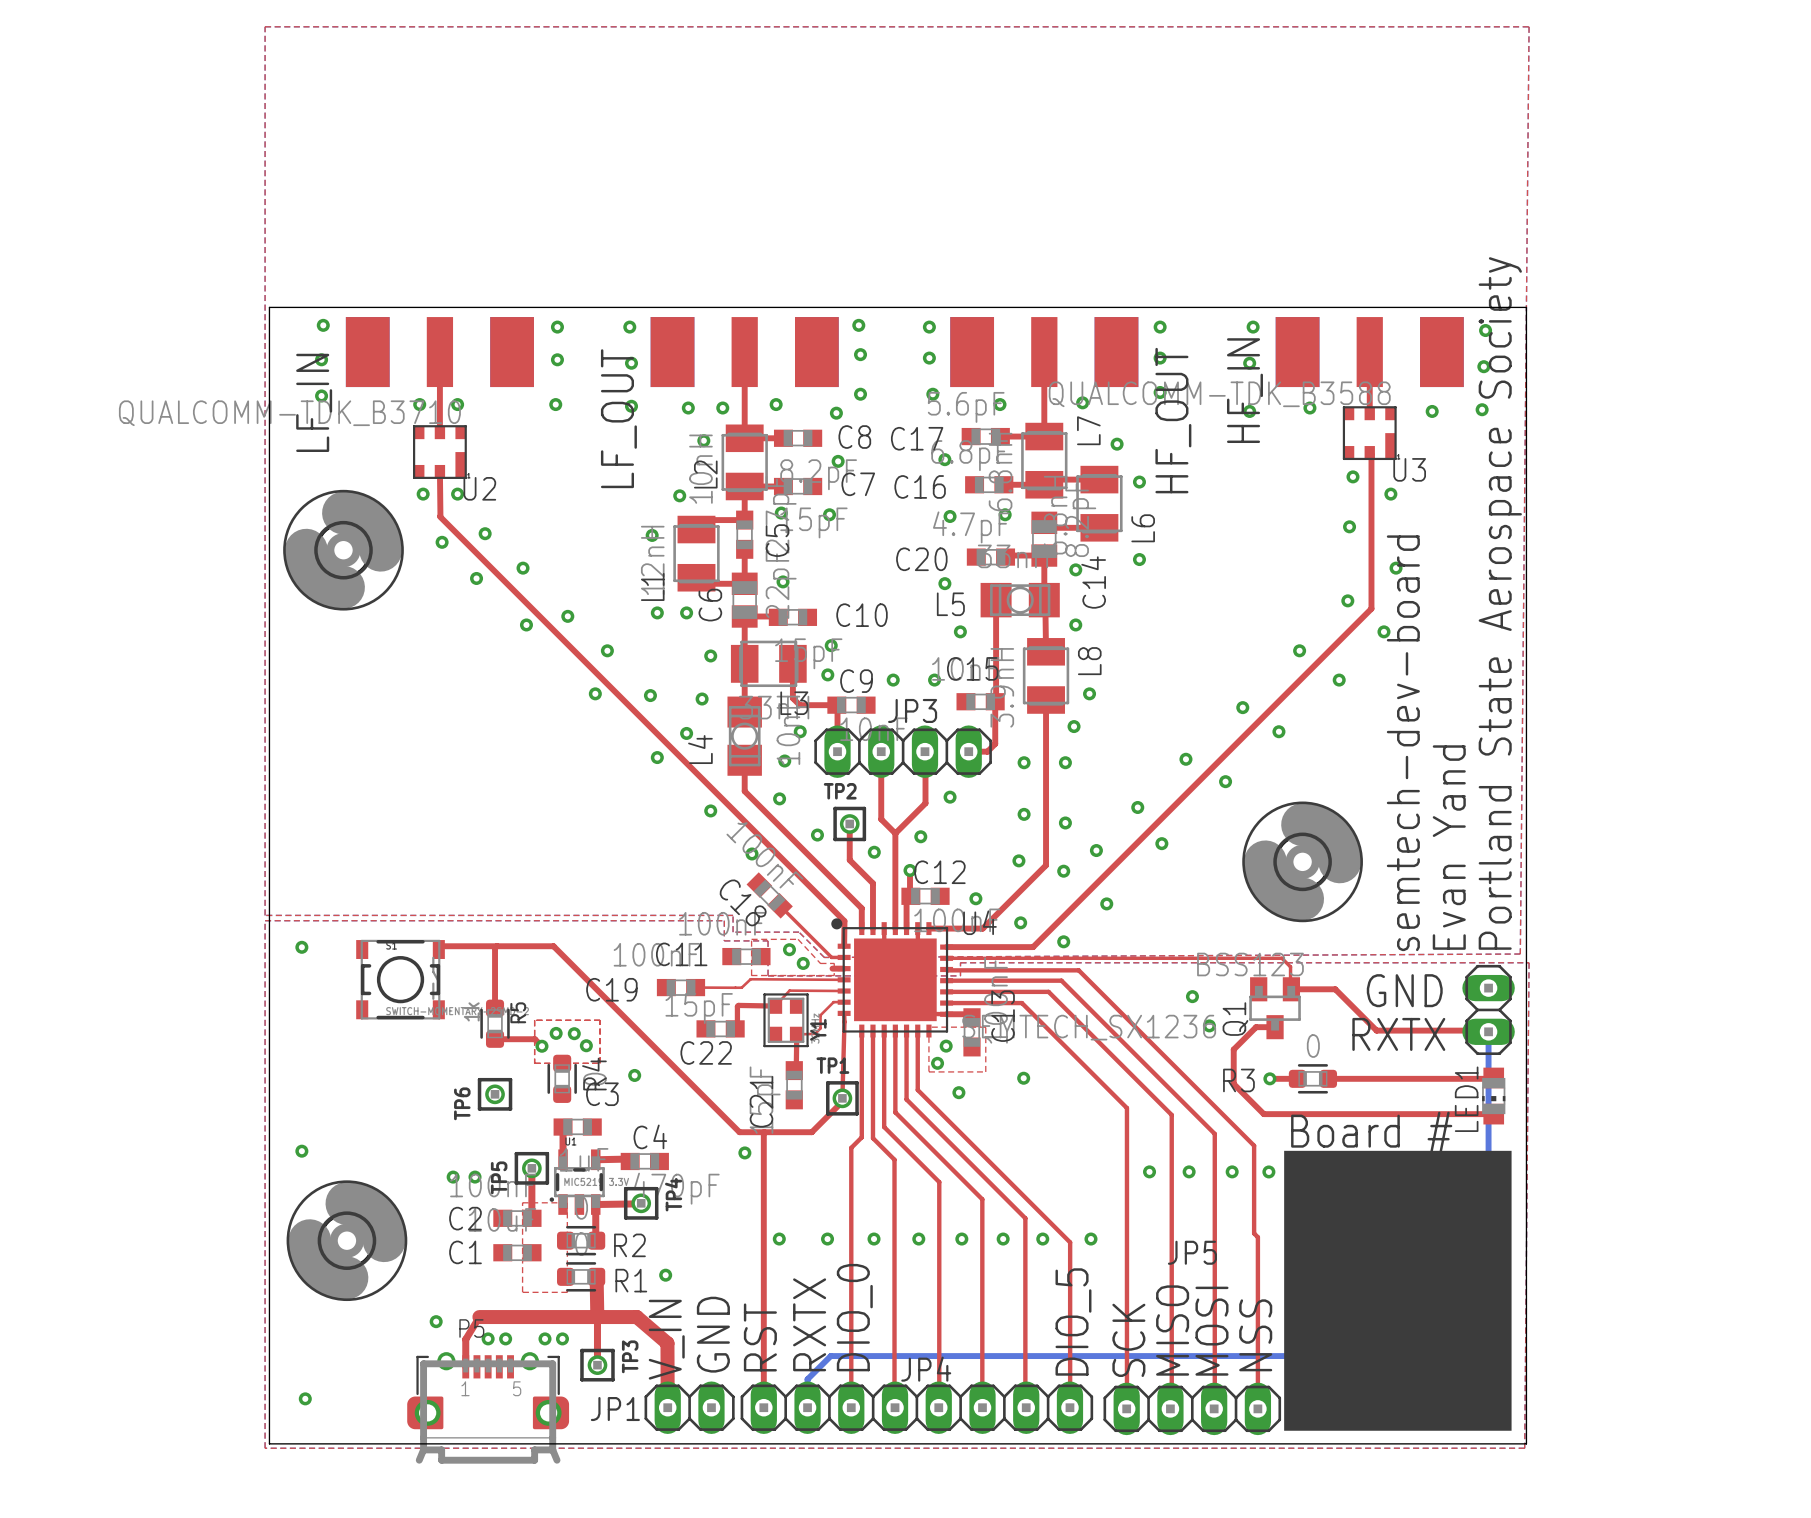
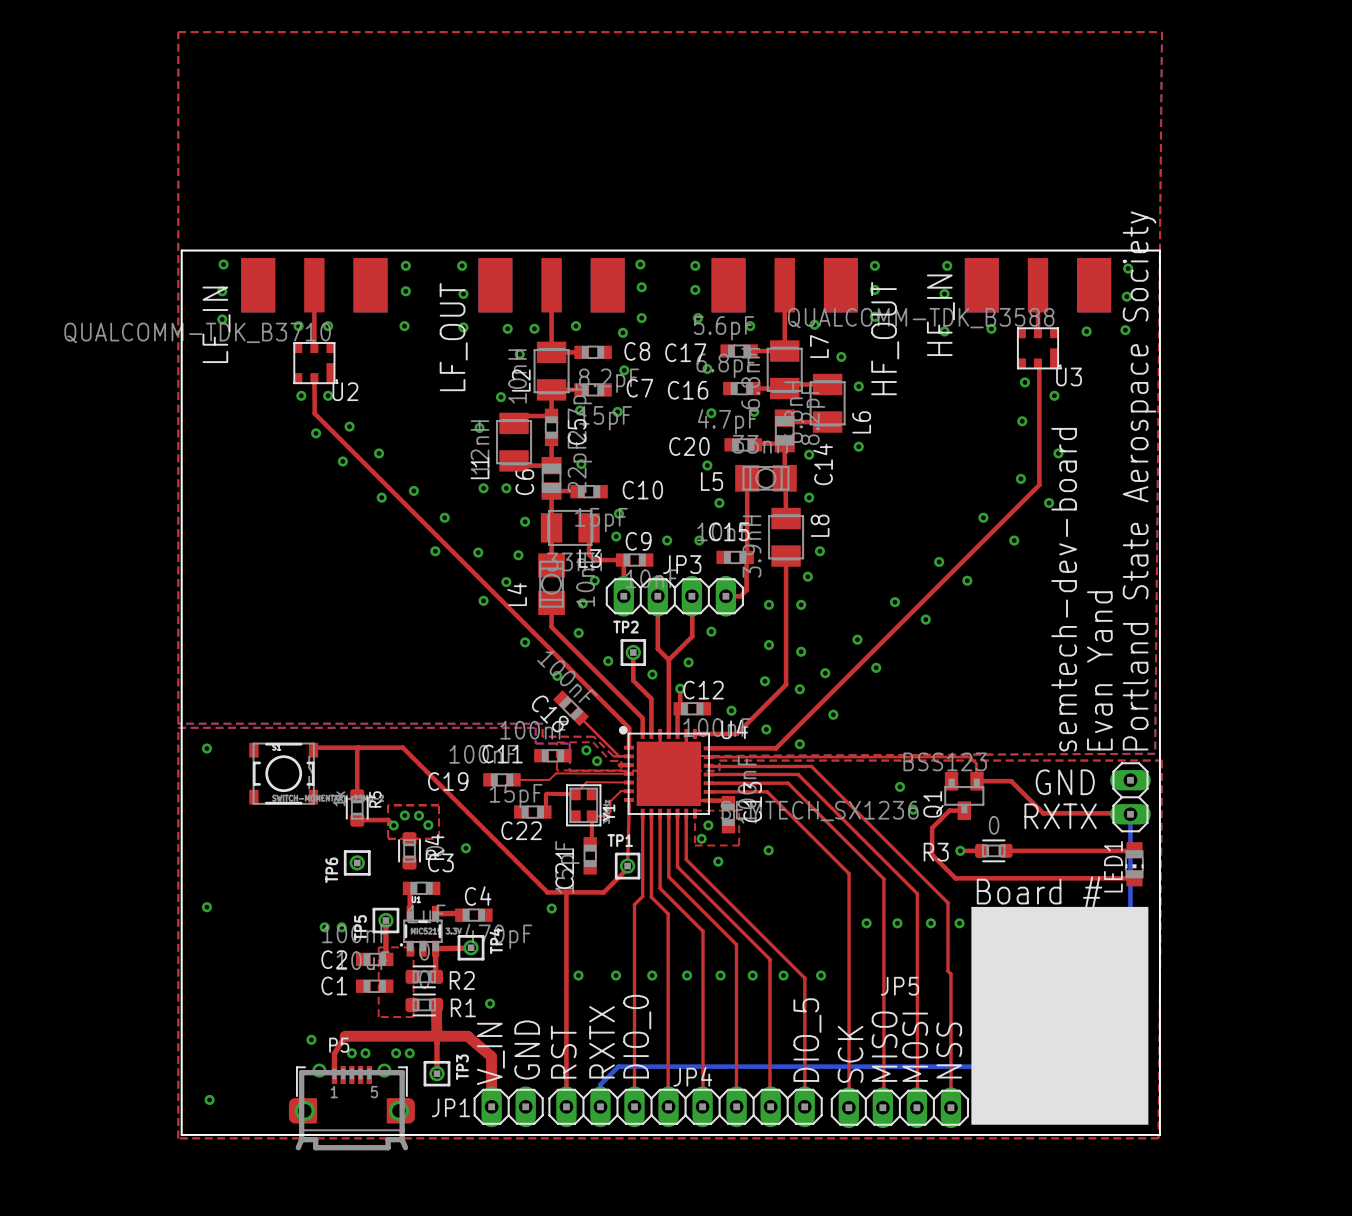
part: (343, 550) -> none
part: (1302, 861) -> none
part: (346, 1240) -> none

